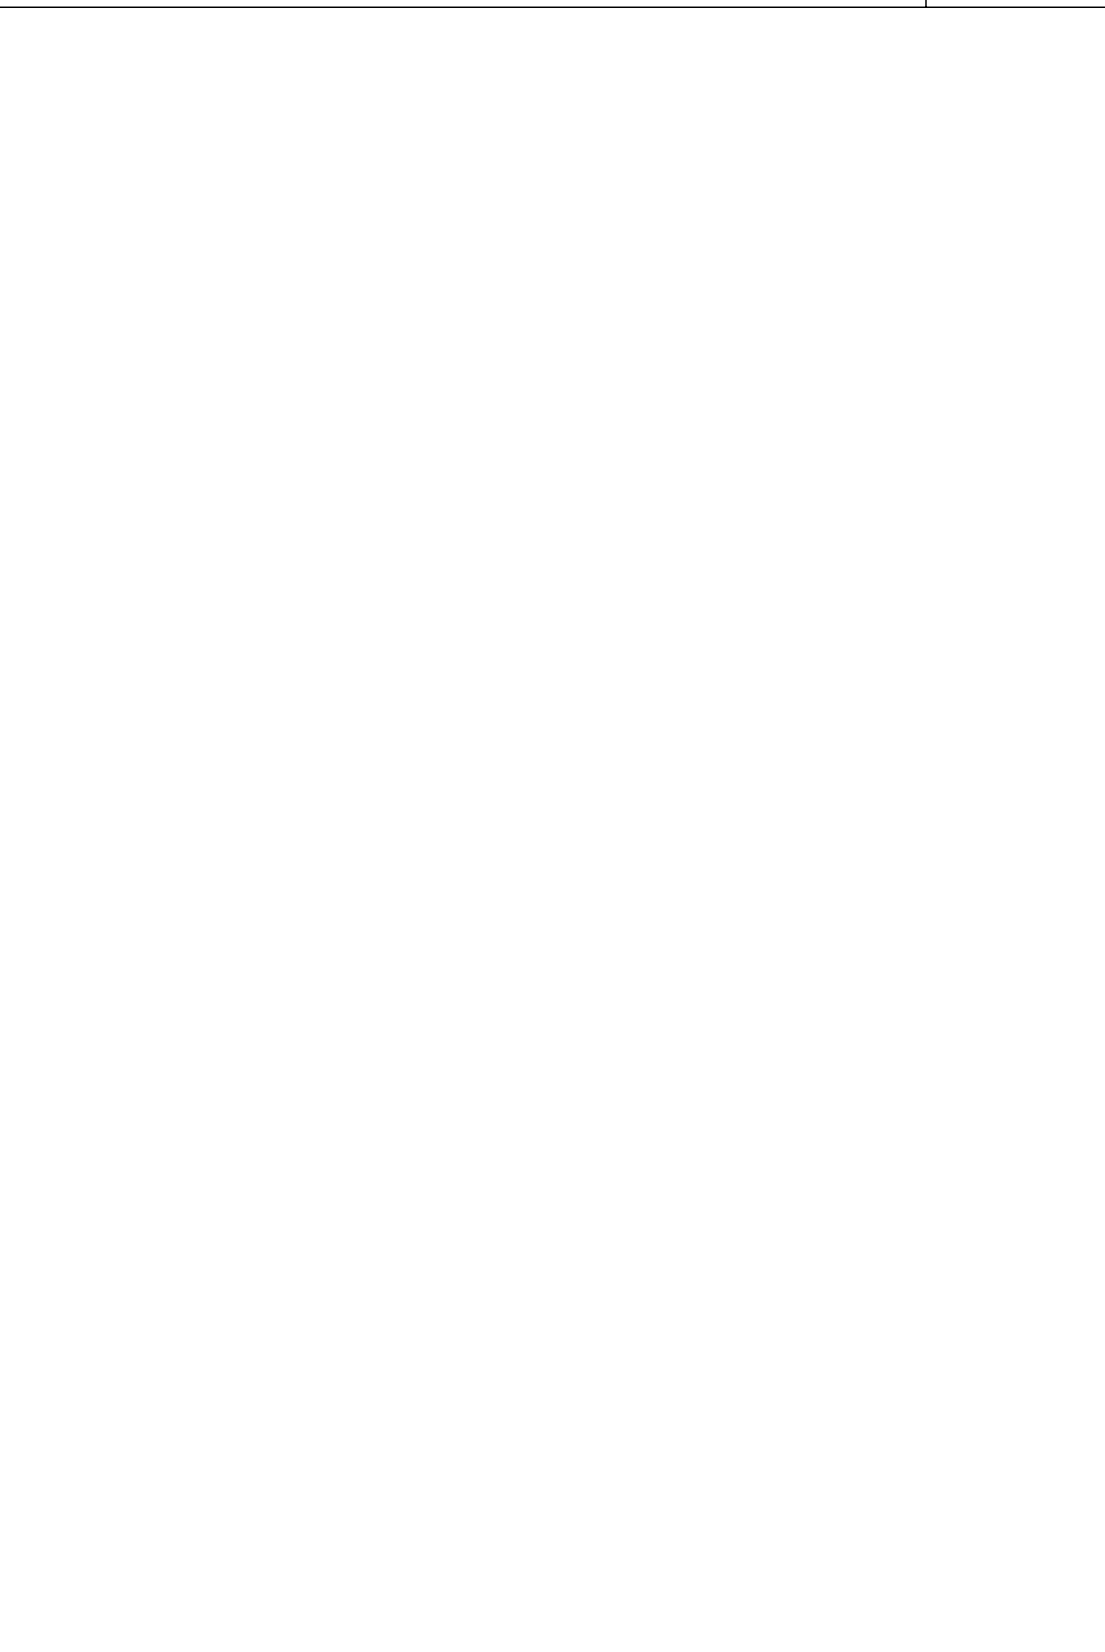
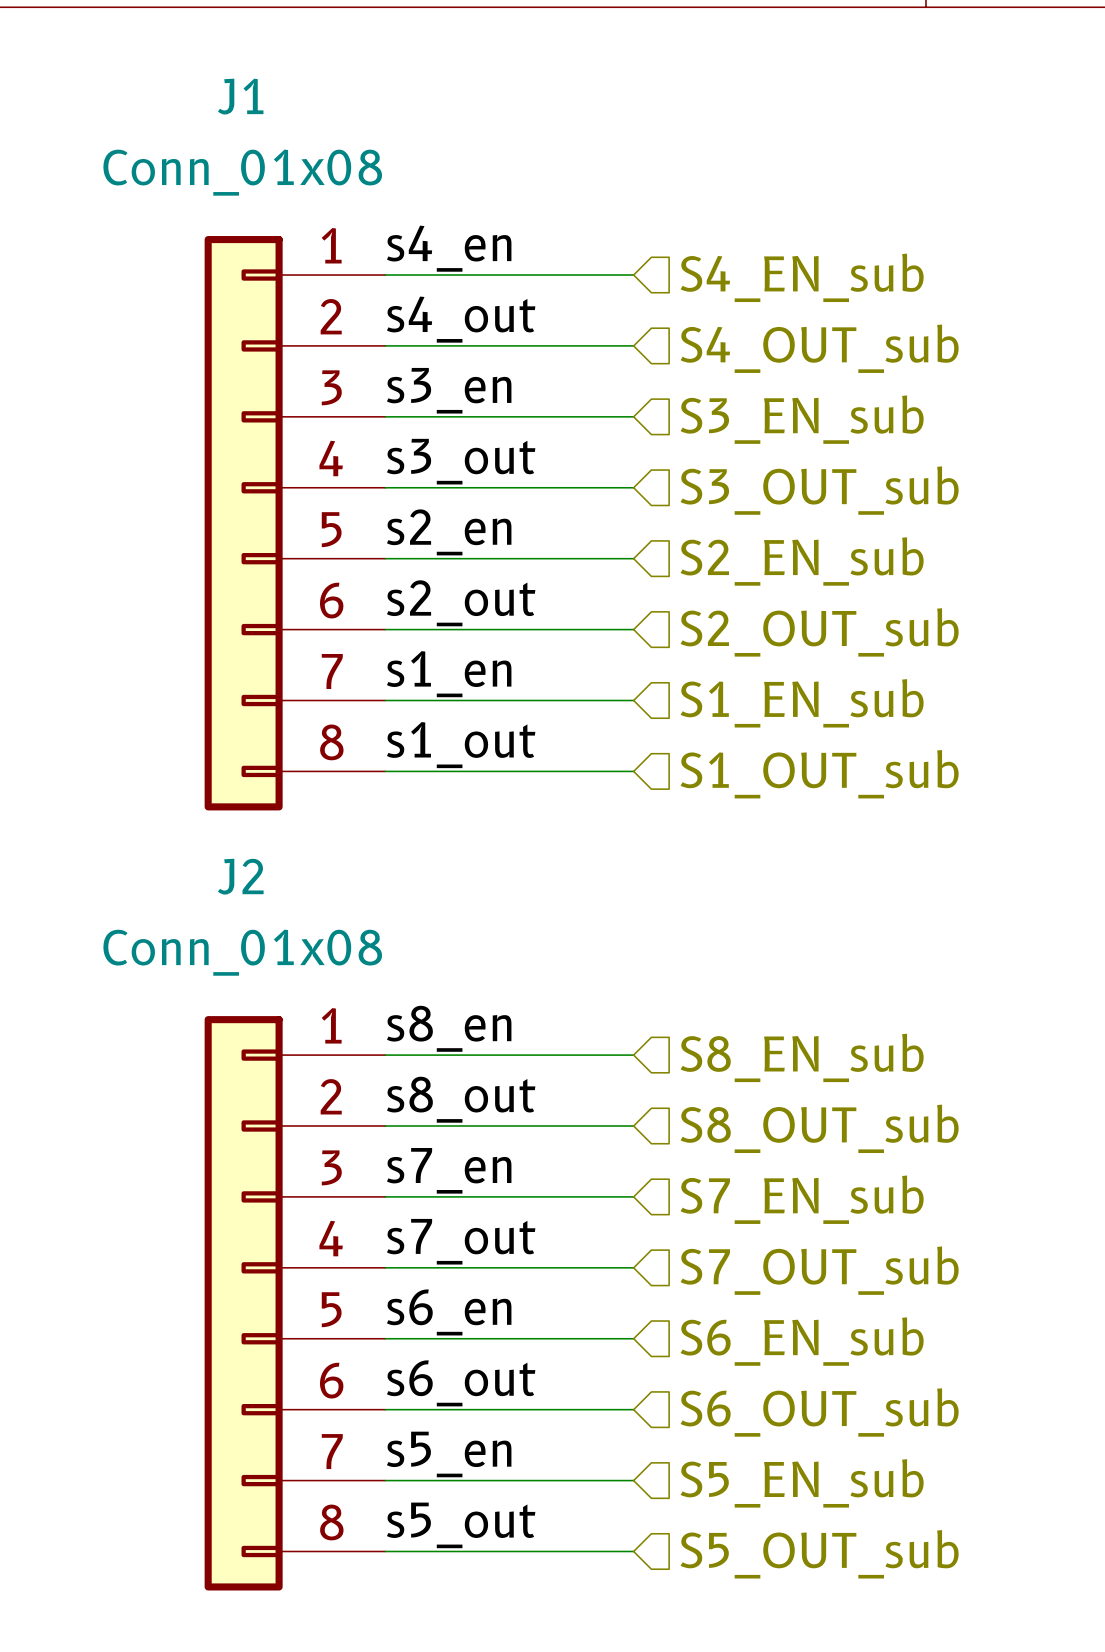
label: none -> s4_en (449, 248)
hierarchical label: none -> S4_EN_sub (802, 277)
wire: none -> (385, 275) (633, 275)
label: none -> s4_out (461, 319)
wire: none -> (385, 345) (633, 345)
hierarchical label: none -> S4_OUT_sub (819, 348)
label: none -> s3_en (449, 390)
wire: none -> (385, 416) (633, 416)
hierarchical label: none -> S3_EN_sub (802, 419)
label: none -> s3_out (461, 461)
wire: none -> (385, 487) (633, 487)
hierarchical label: none -> S3_OUT_sub (819, 490)
J1: none -> Conn_01x08 (295, 523)
label: none -> s2_en (449, 532)
wire: none -> (385, 558) (633, 558)
hierarchical label: none -> S2_EN_sub (802, 561)
label: none -> s2_out (461, 603)
wire: none -> (385, 629) (633, 629)
hierarchical label: none -> S2_OUT_sub (819, 632)
label: none -> s1_en (449, 674)
wire: none -> (385, 700) (633, 700)
hierarchical label: none -> S1_EN_sub (802, 703)
label: none -> s1_out (461, 745)
wire: none -> (385, 771) (633, 771)
hierarchical label: none -> S1_OUT_sub (819, 774)
label: none -> s8_en (449, 1028)
wire: none -> (385, 1055) (633, 1055)
hierarchical label: none -> S8_EN_sub (802, 1057)
label: none -> s8_out (461, 1099)
wire: none -> (385, 1126) (633, 1126)
hierarchical label: none -> S8_OUT_sub (819, 1128)
label: none -> s7_en (449, 1170)
wire: none -> (385, 1196) (633, 1196)
hierarchical label: none -> S7_EN_sub (802, 1199)
label: none -> s7_out (461, 1241)
wire: none -> (385, 1267) (633, 1267)
hierarchical label: none -> S7_OUT_sub (819, 1270)
J2: none -> Conn_01x08 (295, 1303)
label: none -> s6_en (449, 1312)
wire: none -> (385, 1338) (633, 1338)
hierarchical label: none -> S6_EN_sub (802, 1341)
label: none -> s6_out (461, 1383)
wire: none -> (385, 1409) (633, 1409)
hierarchical label: none -> S6_OUT_sub (819, 1412)
label: none -> s5_en (449, 1454)
wire: none -> (385, 1480) (633, 1480)
hierarchical label: none -> S5_EN_sub (802, 1483)
label: none -> s5_out (461, 1525)
wire: none -> (385, 1551) (633, 1551)
hierarchical label: none -> S5_OUT_sub (819, 1554)

